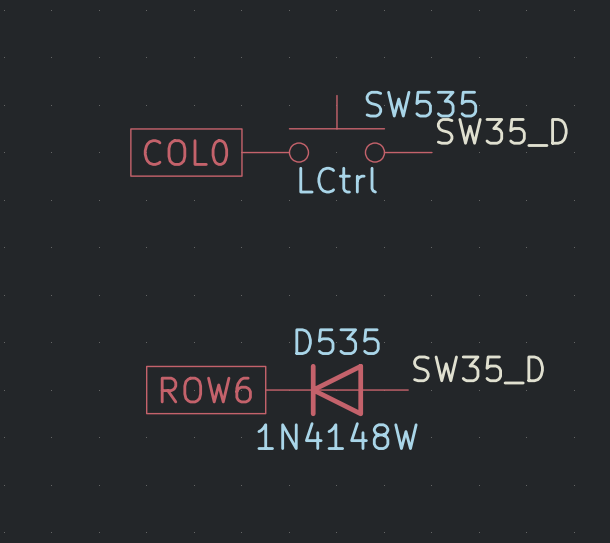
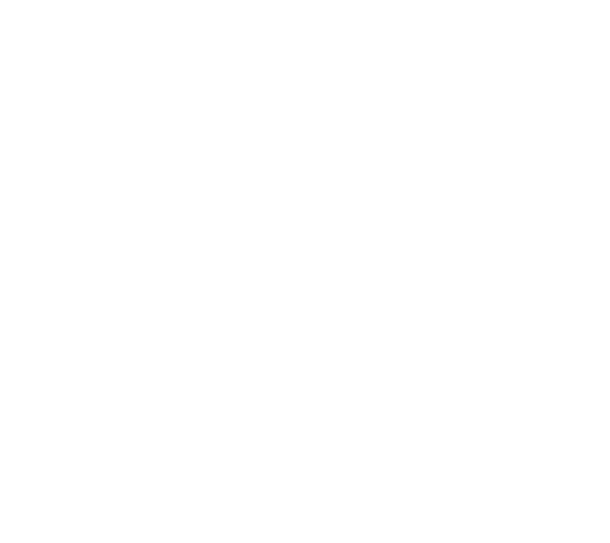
SW535: LCtrl (336, 128) -> none
label: SW35_D (502, 132) -> none
global label: COL0 (185, 152) -> none
label: SW35_D (478, 369) -> none
global label: ROW6 (206, 390) -> none
D535: 1N4148W (336, 390) -> none

